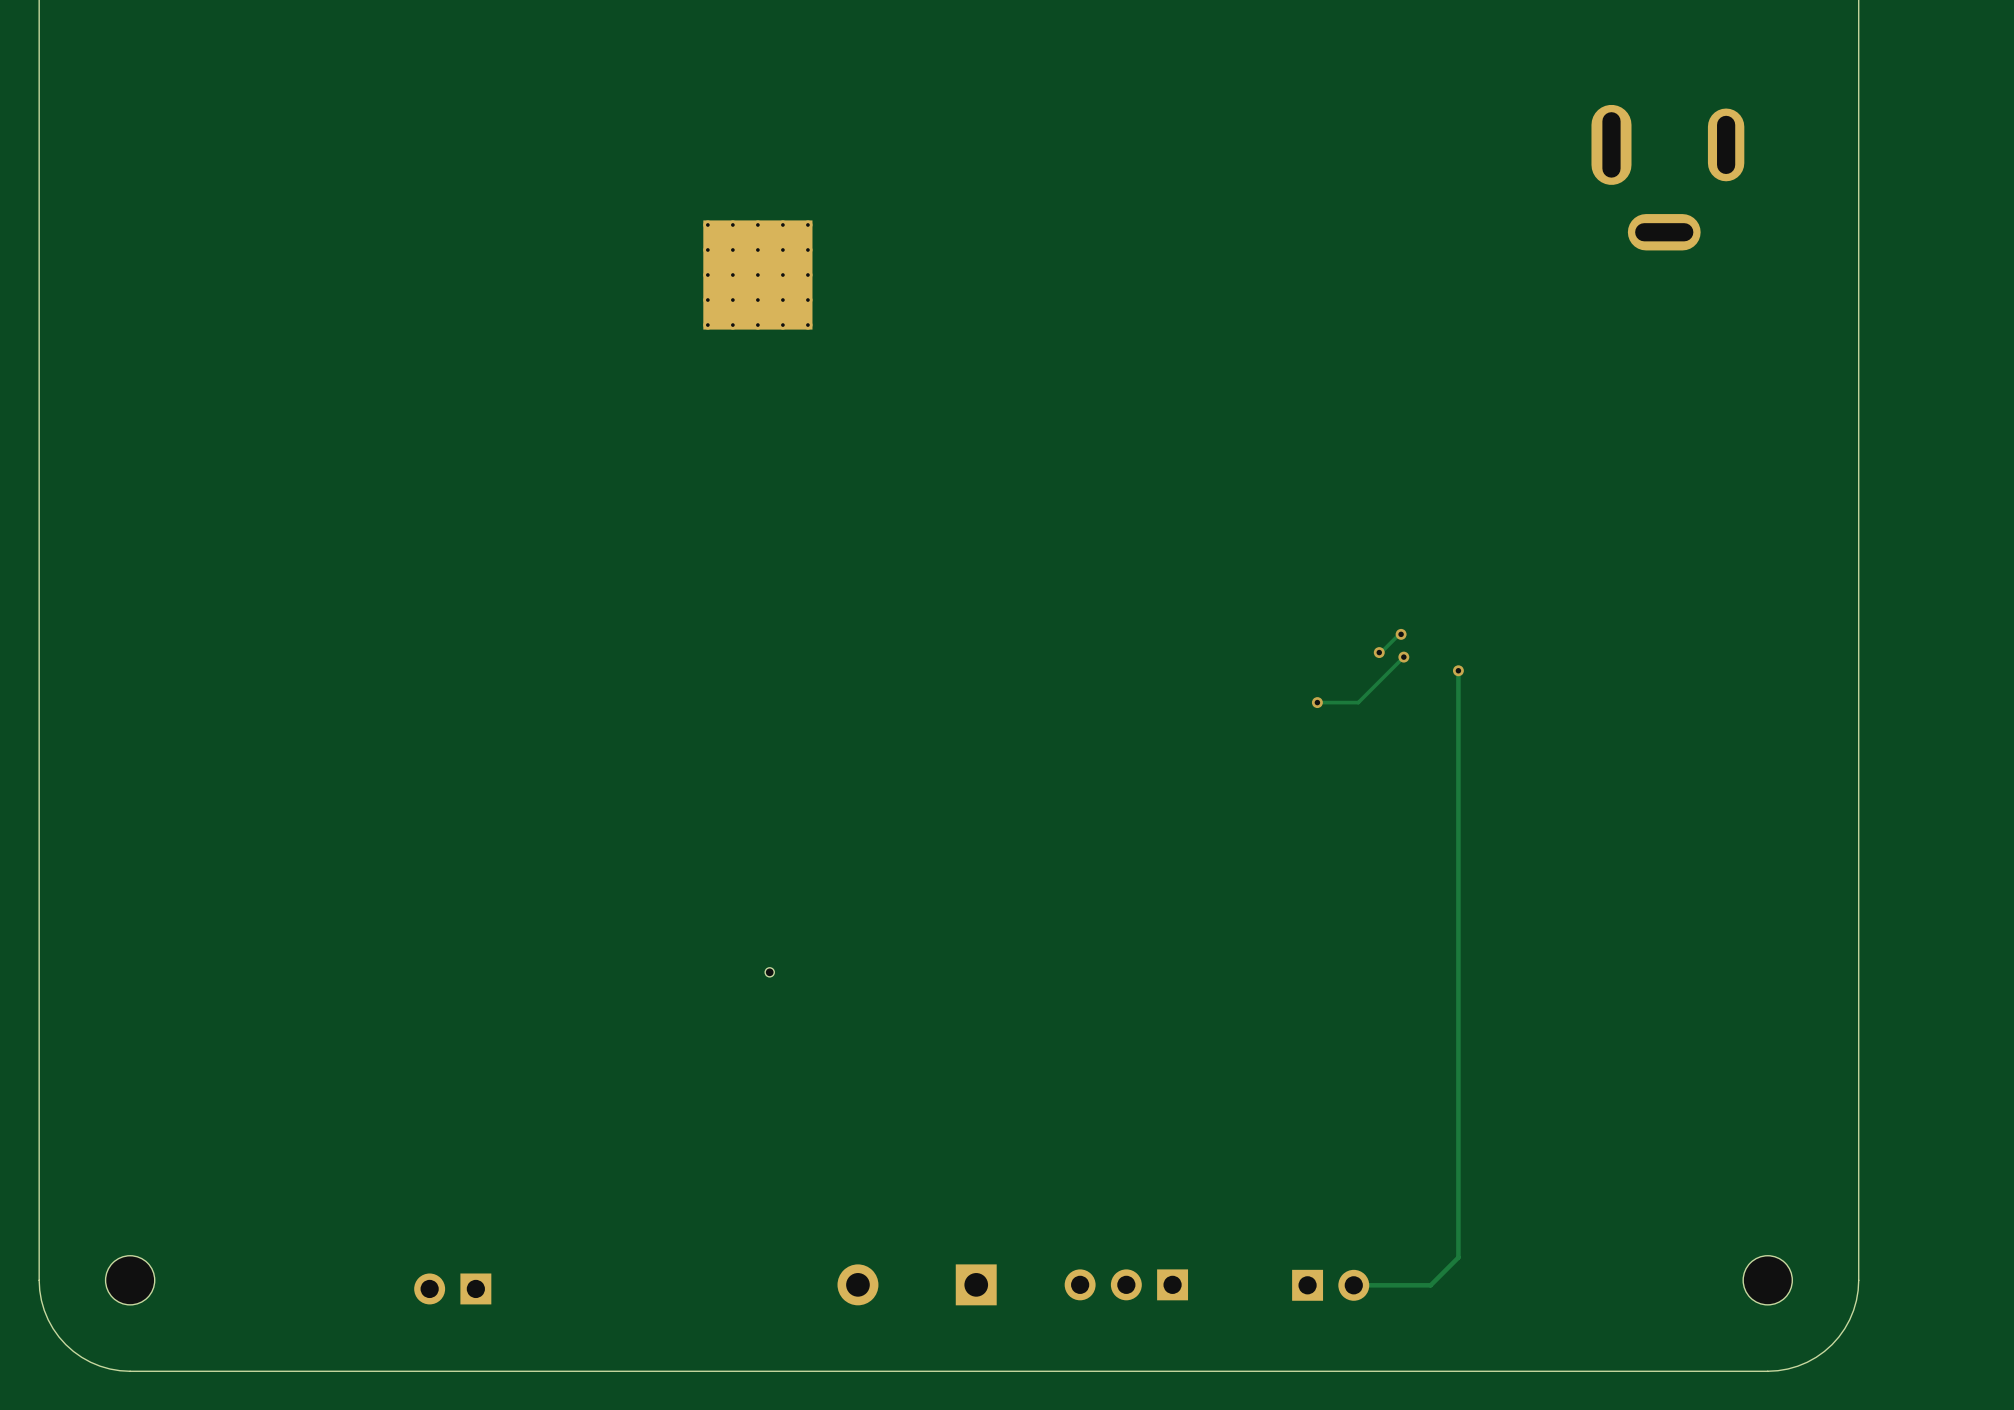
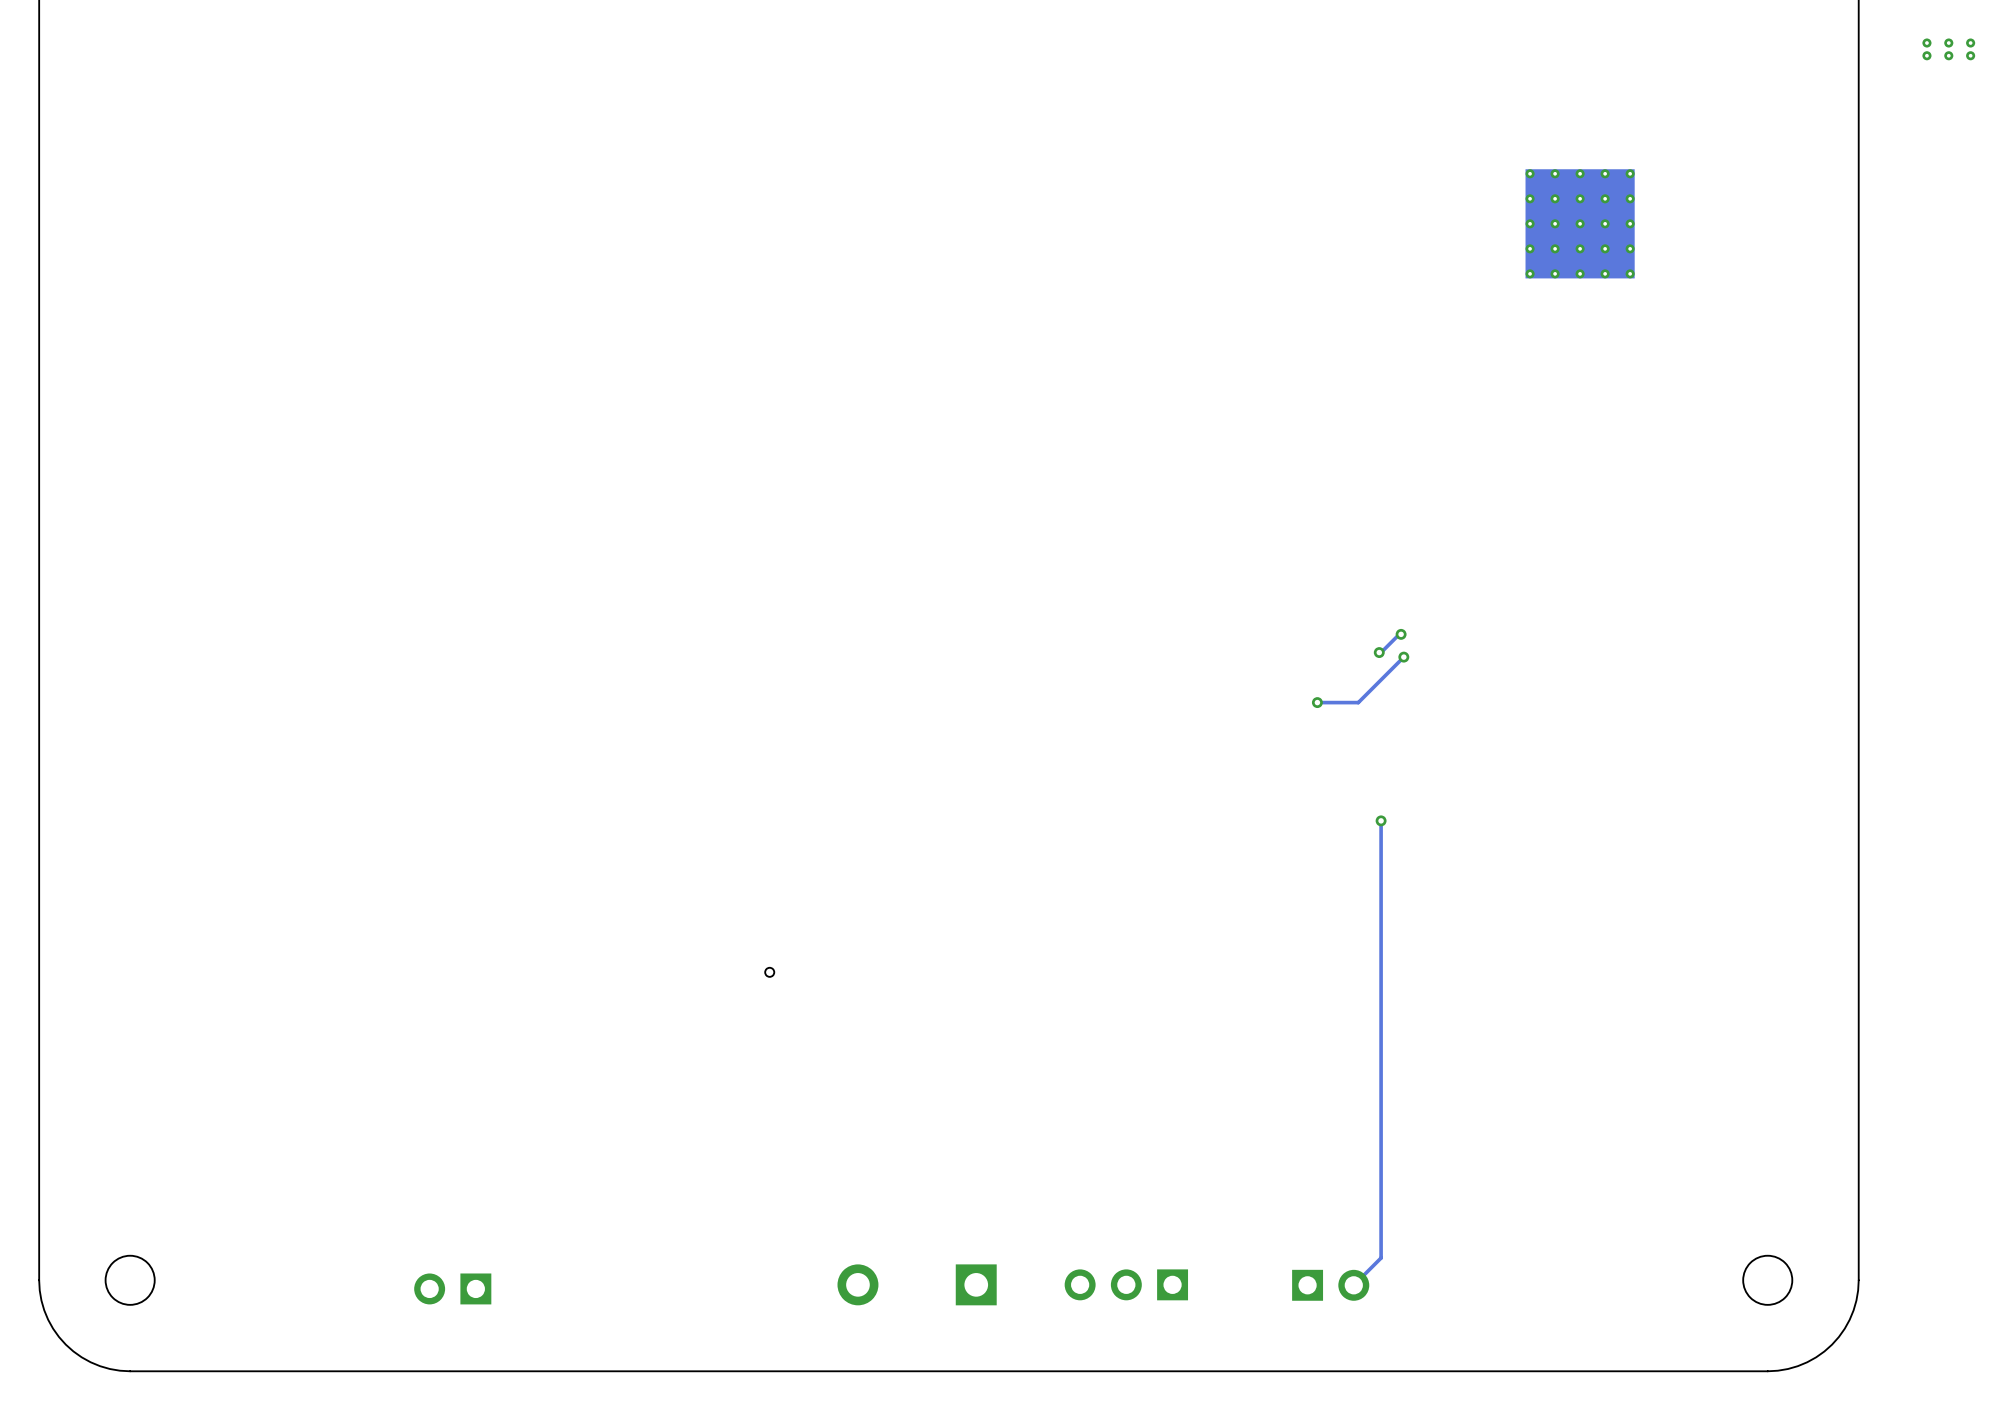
part: none -> (1948, 49)
part: (1667, 177) -> none
part: none -> (1580, 223)
part: (757, 275) -> none
track: (1458, 670) (1458, 1257) (1430, 1285) (1353, 1285) -> (1381, 820) (1381, 1258) (1353, 1285)
via: (1458, 670) -> none
via: none -> (1381, 820)

